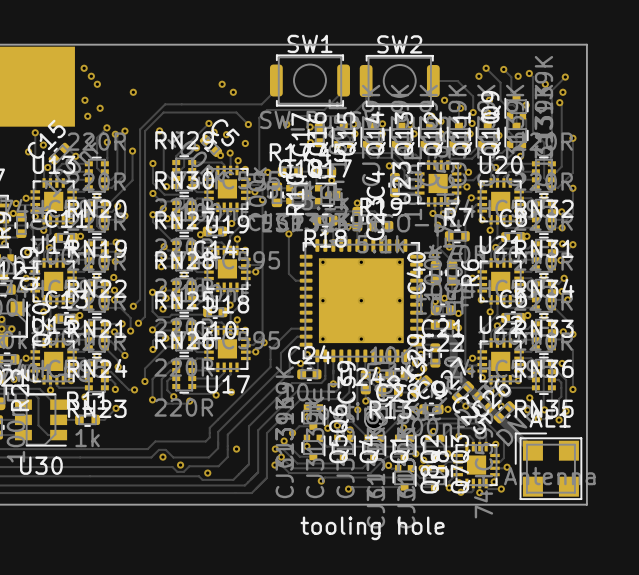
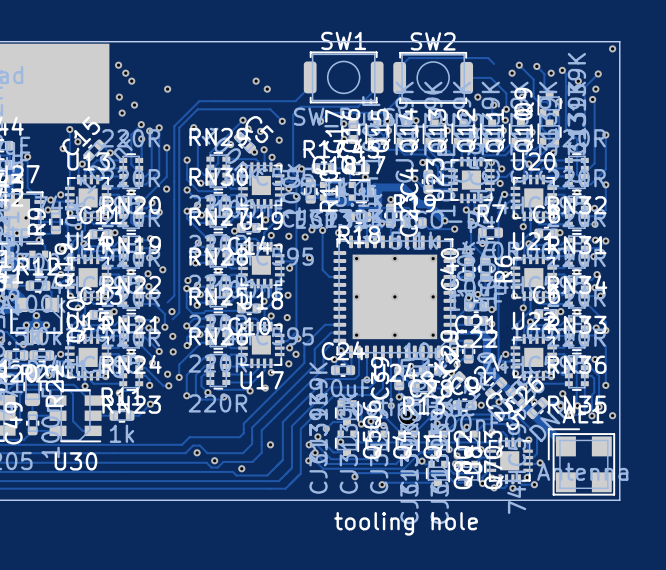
via: none -> (612, 48)
track: none -> (494, 64) (488, 58) (409, 58) (398, 68) (398, 79)
track: none -> (414, 178) (425, 189) (428, 189)
via: none -> (414, 178)
via: none -> (166, 189)
track: none -> (444, 220) (428, 204) (419, 204) (402, 187) (374, 187) (378, 190) (378, 219) (381, 223) (375, 228)
via: none -> (444, 220)
track: none -> (422, 222) (429, 229) (454, 229)
via: none -> (454, 229)
via: none -> (311, 229)
via: none -> (338, 232)
via: none -> (288, 236)
via: none -> (305, 237)
via: none -> (309, 257)
via: none -> (162, 269)
via: none -> (187, 280)
via: none -> (288, 295)
via: (133, 306) -> none
via: none -> (171, 311)
via: none -> (287, 317)
via: (138, 323) -> none
via: none -> (172, 336)
via: none -> (173, 351)
via: none -> (295, 354)
via: none -> (288, 363)
via: none -> (271, 372)
via: none -> (167, 374)
via: none -> (612, 415)

